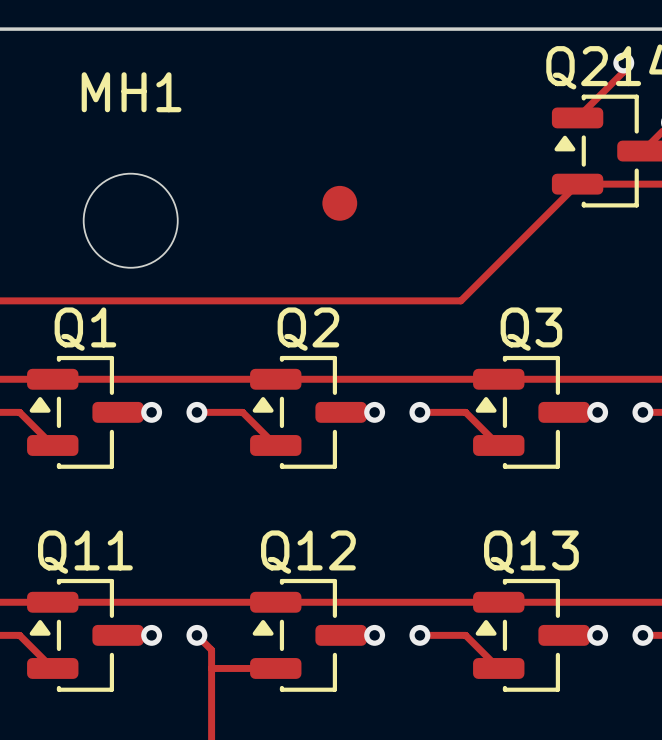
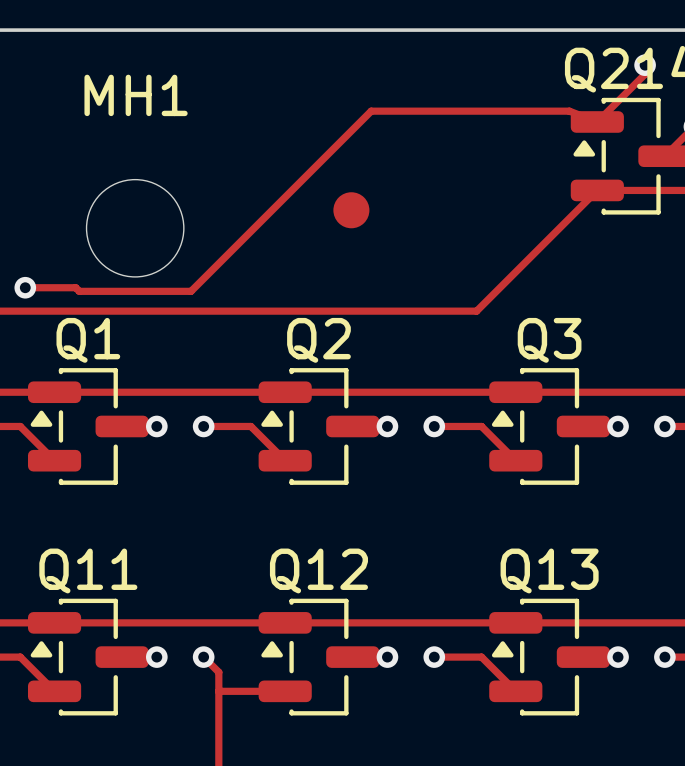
track: none -> (597, 121) (569, 111) (371, 111) (191, 291) (79, 291) (75, 287) (25, 287)
via: none -> (25, 287)

